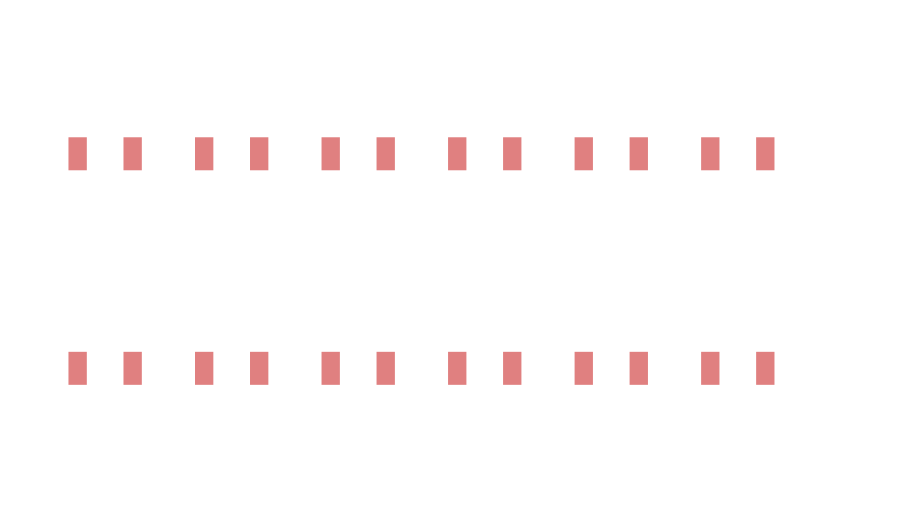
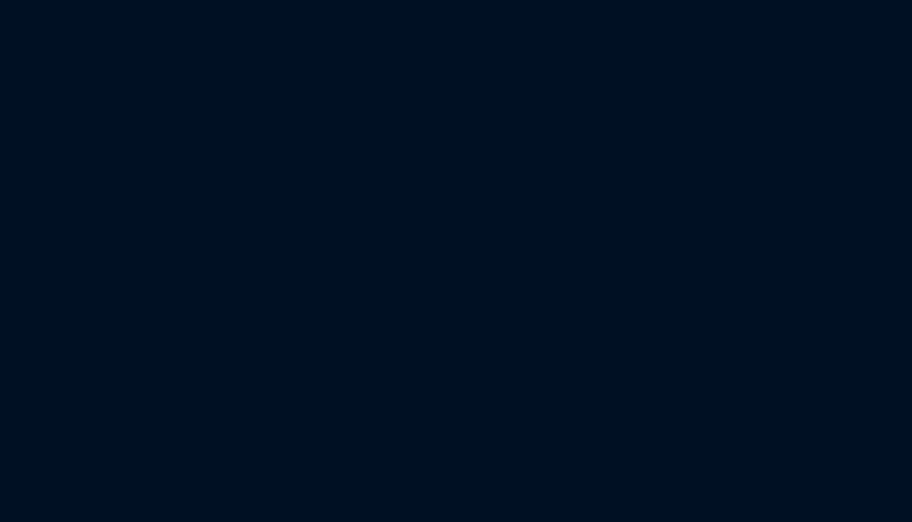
part: (105, 153) -> none
part: (231, 153) -> none
part: (358, 153) -> none
part: (484, 153) -> none
part: (611, 153) -> none
part: (737, 153) -> none
part: (105, 368) -> none
part: (231, 368) -> none
part: (358, 368) -> none
part: (484, 368) -> none
part: (611, 368) -> none
part: (737, 368) -> none

